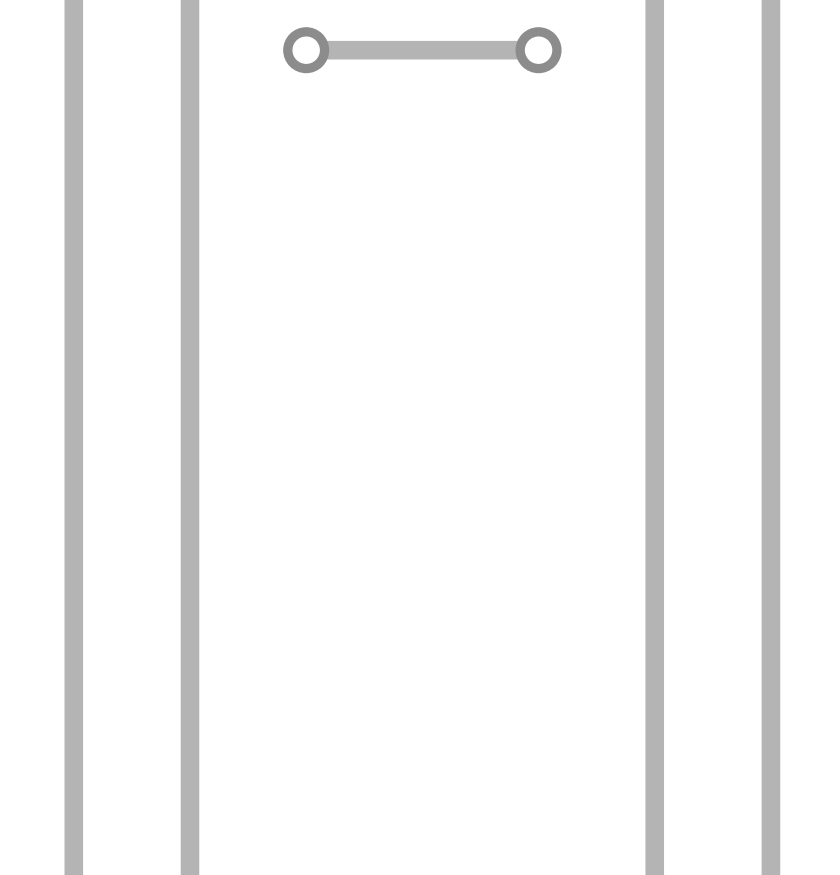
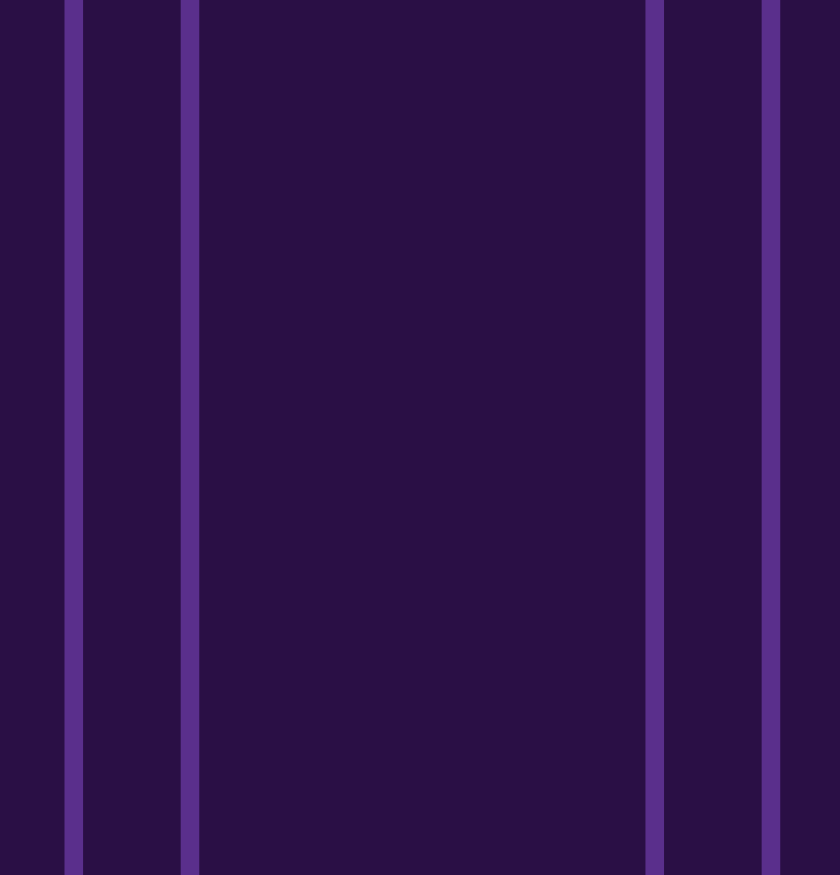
via: (306, 50) -> none
track: (538, 50) (306, 50) -> none
via: (538, 50) -> none

